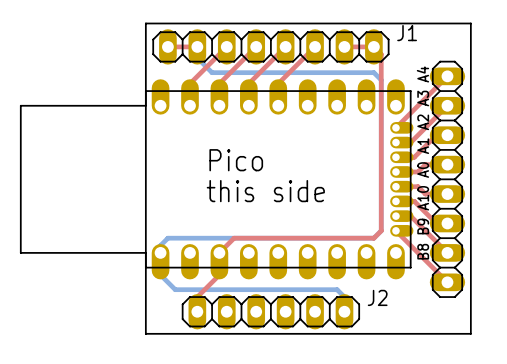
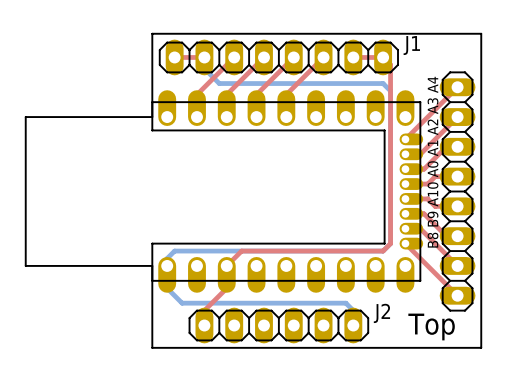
board edge: (145, 119) (145, 230) -> (152, 130) (384, 130) (384, 243) (152, 243)
text: Pico (236, 160) -> none
text: this side (265, 191) -> none
text: none -> Top (431, 326)

